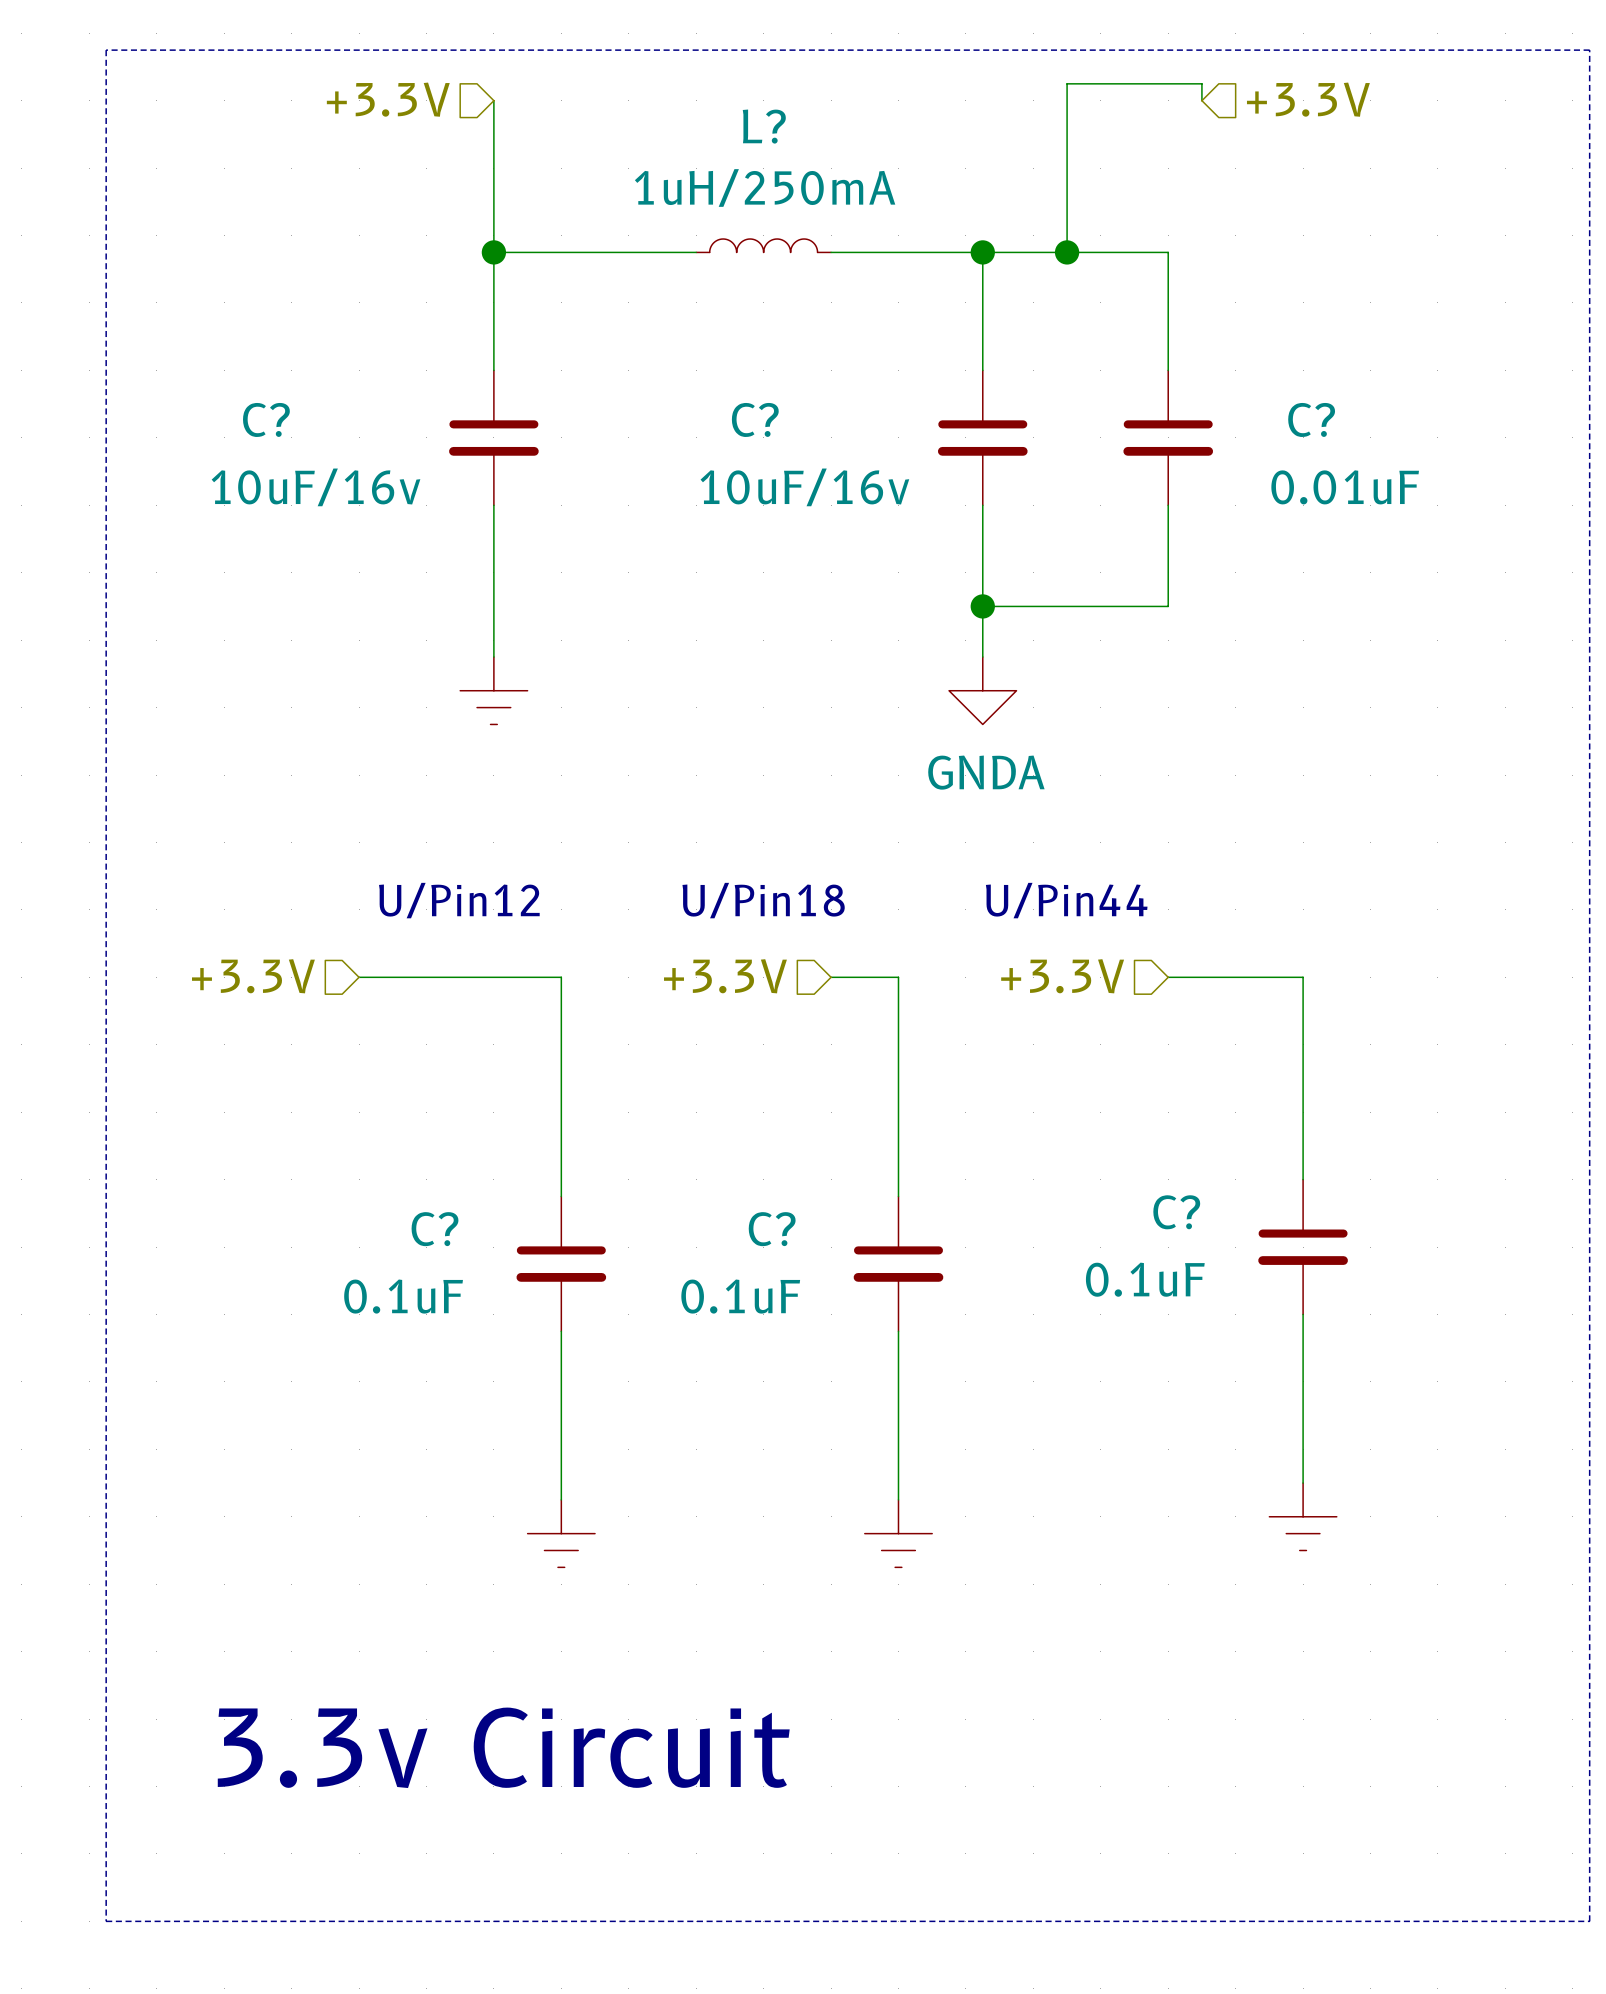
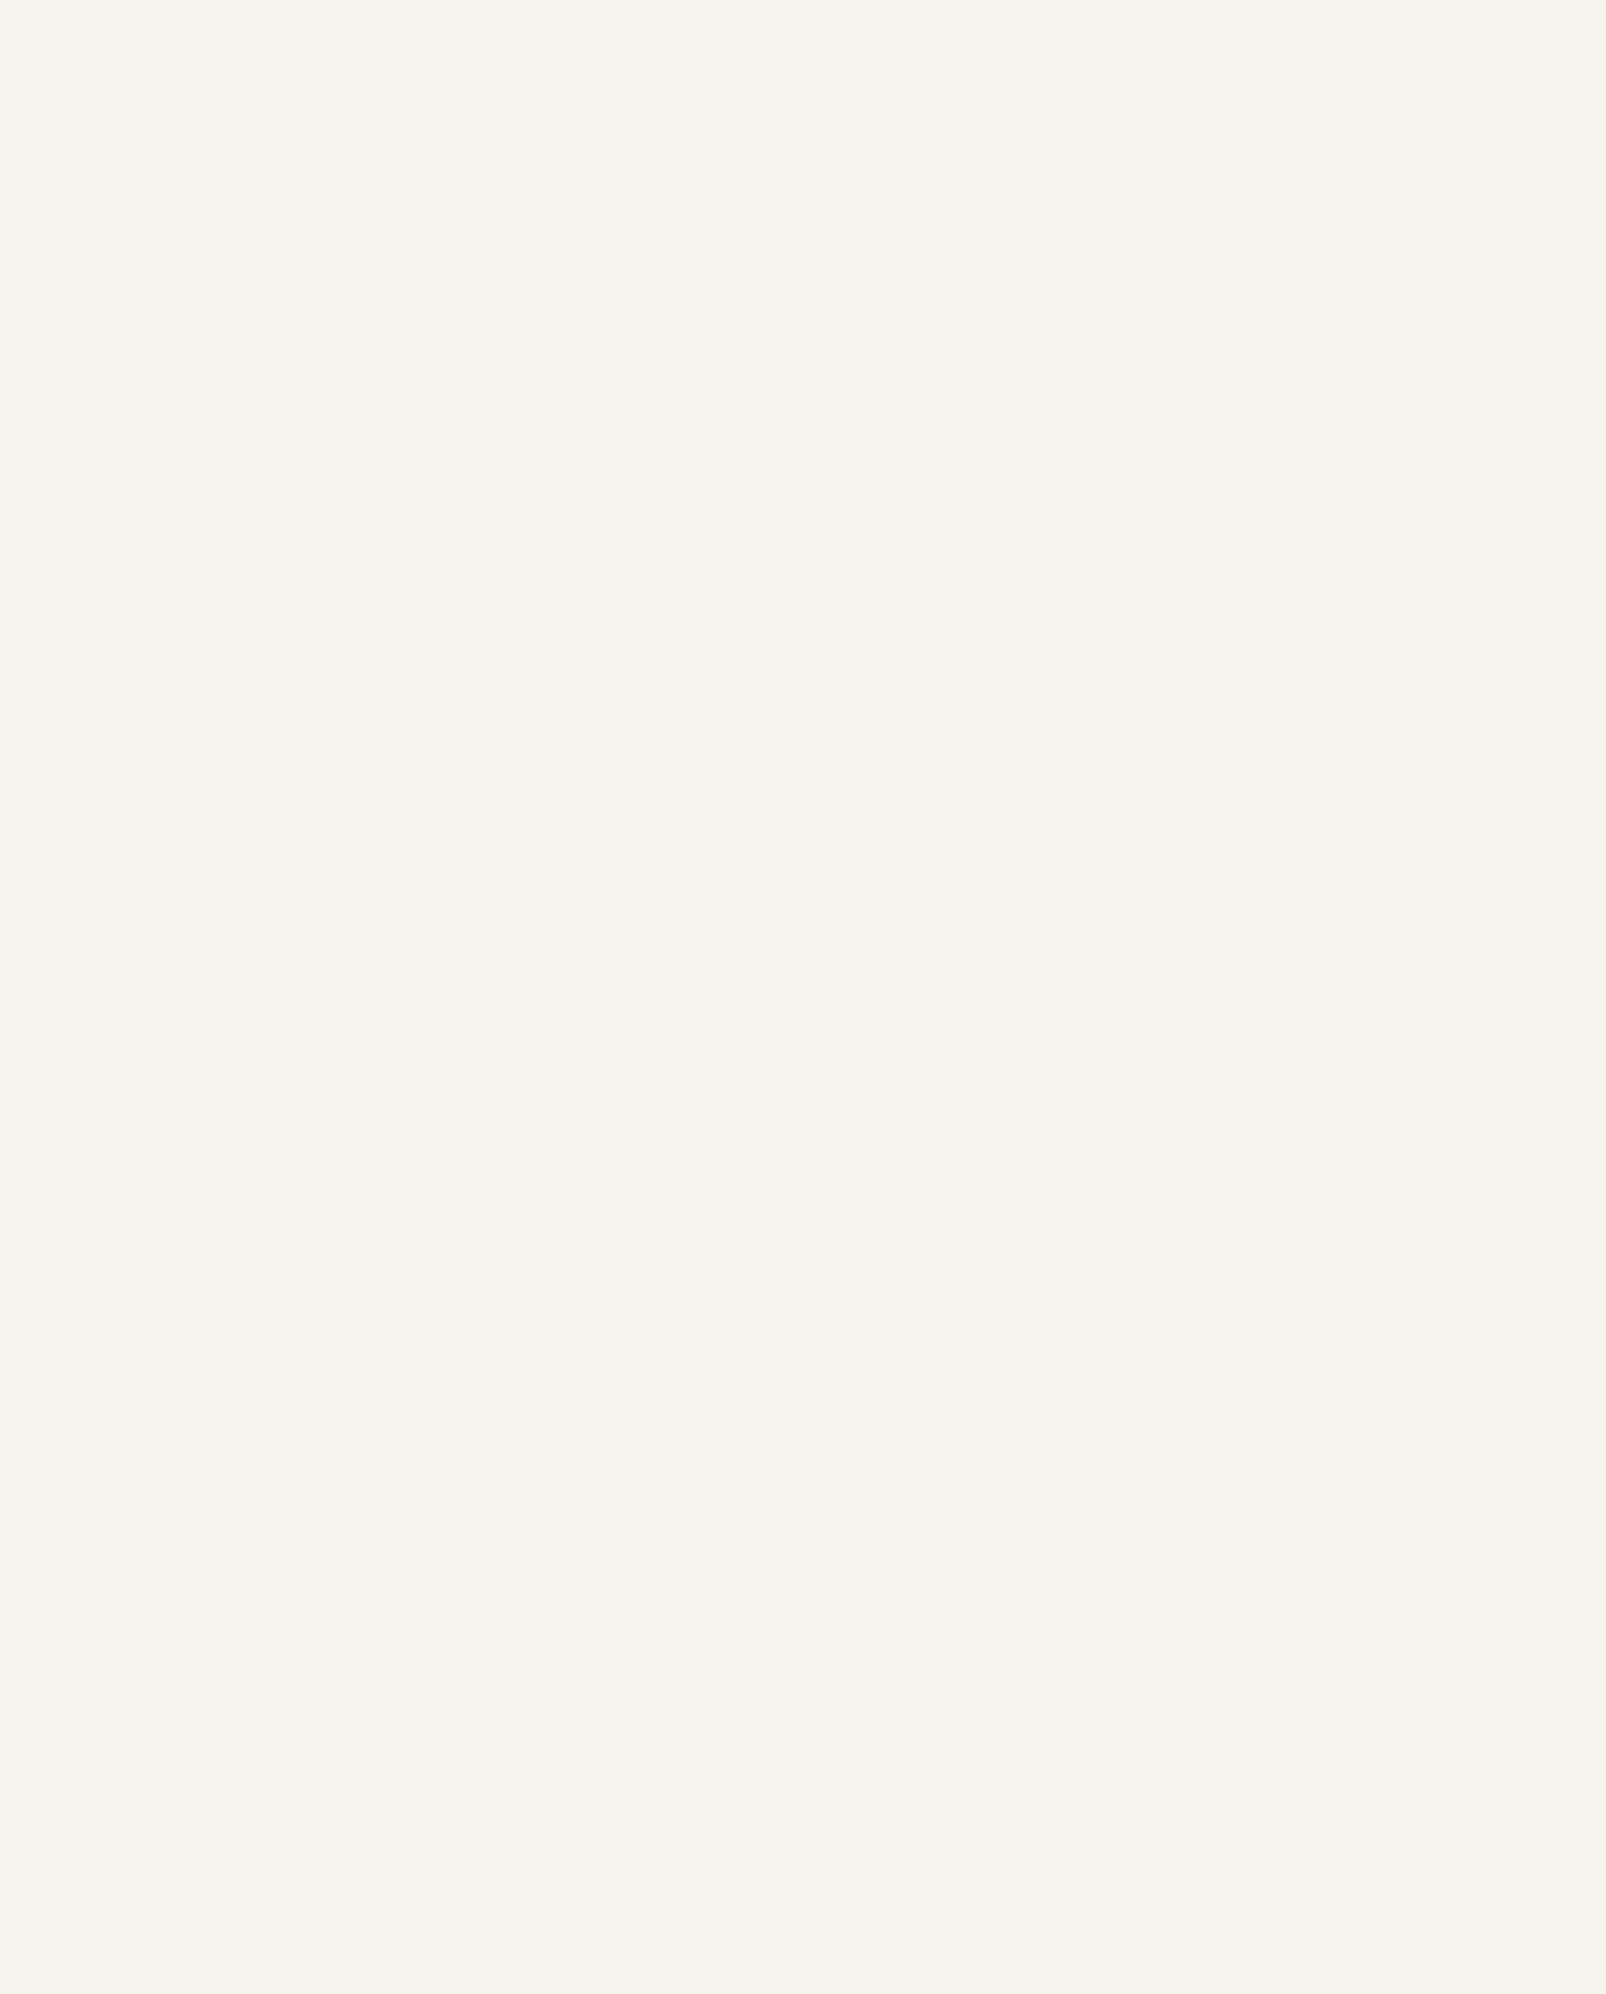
line: (106, 50) (1589, 50) (1589, 1921) (106, 1921) (106, 50) -> none
hierarchical label: +3.3V (388, 99) -> none
hierarchical label: +3.3V (1308, 99) -> none
wire: (493, 100) (493, 370) -> none
wire: (1201, 100) (1201, 83) (1067, 83) (1067, 252) -> none
L?: 1uH/250mA (763, 245) -> none
wire: (493, 252) (696, 252) -> none
junction: (493, 252) -> none
wire: (831, 252) (1168, 252) (1168, 370) -> none
wire: (982, 252) (982, 370) -> none
junction: (982, 252) -> none
junction: (1067, 252) -> none
C?: 10uF/16v (493, 437) -> none
C?: 10uF/16v (982, 437) -> none
C?: 0.01uF (1168, 437) -> none
wire: (493, 505) (493, 657) -> none
wire: (982, 505) (982, 657) -> none
wire: (1168, 505) (1168, 606) (982, 606) -> none
junction: (982, 606) -> none
power symbol: (493, 690) -> none
power symbol: GNDA (982, 690) -> none
text: U/Pin12 (459, 900) -> none
text: U/Pin18 (763, 900) -> none
text: U/Pin44 (1066, 900) -> none
hierarchical label: +3.3V (253, 976) -> none
hierarchical label: +3.3V (725, 976) -> none
hierarchical label: +3.3V (1062, 976) -> none
wire: (359, 977) (561, 977) (561, 1196) -> none
wire: (831, 977) (898, 977) (898, 1196) -> none
wire: (1168, 977) (1303, 977) (1303, 1179) -> none
C?: 0.1uF (1303, 1247) -> none
C?: 0.1uF (561, 1263) -> none
C?: 0.1uF (898, 1263) -> none
wire: (1303, 1314) (1303, 1483) -> none
wire: (561, 1331) (561, 1499) -> none
wire: (898, 1331) (898, 1499) -> none
power symbol: (1303, 1516) -> none
power symbol: (561, 1533) -> none
power symbol: (898, 1533) -> none
text: 3.3v Circuit (503, 1747) -> none

